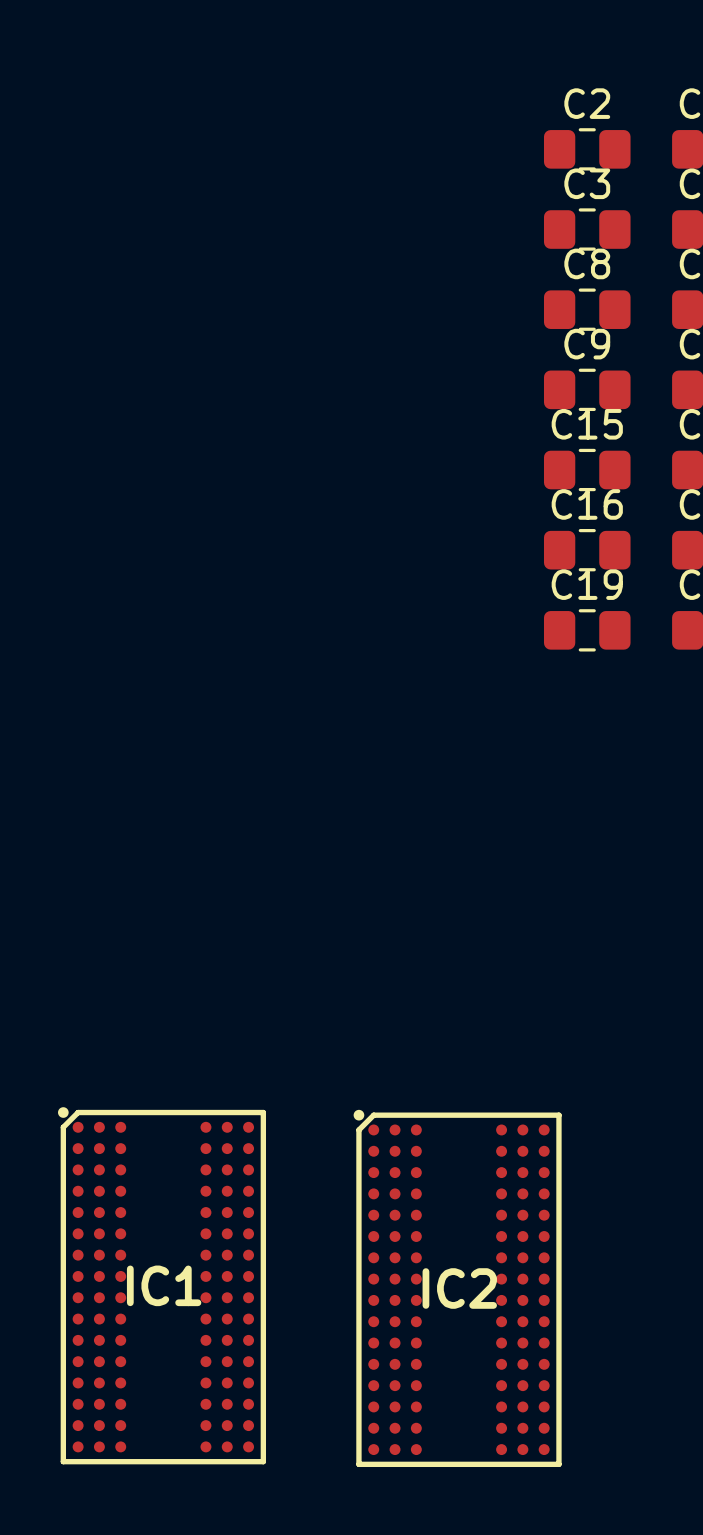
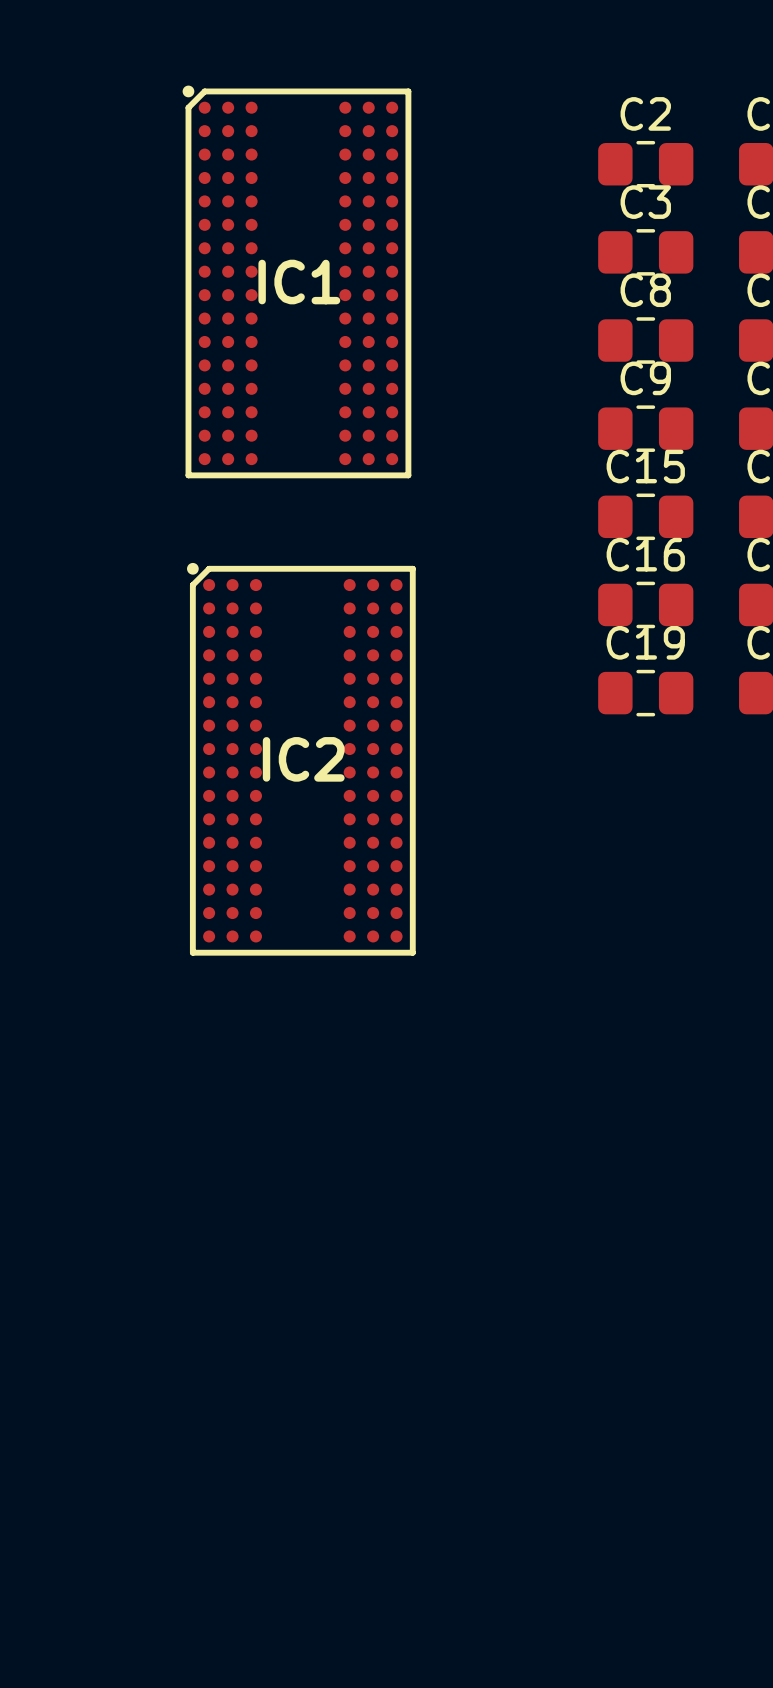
IC1 position: (162, 1285) -> (296, 281)
IC2 position: (457, 1288) -> (301, 759)

